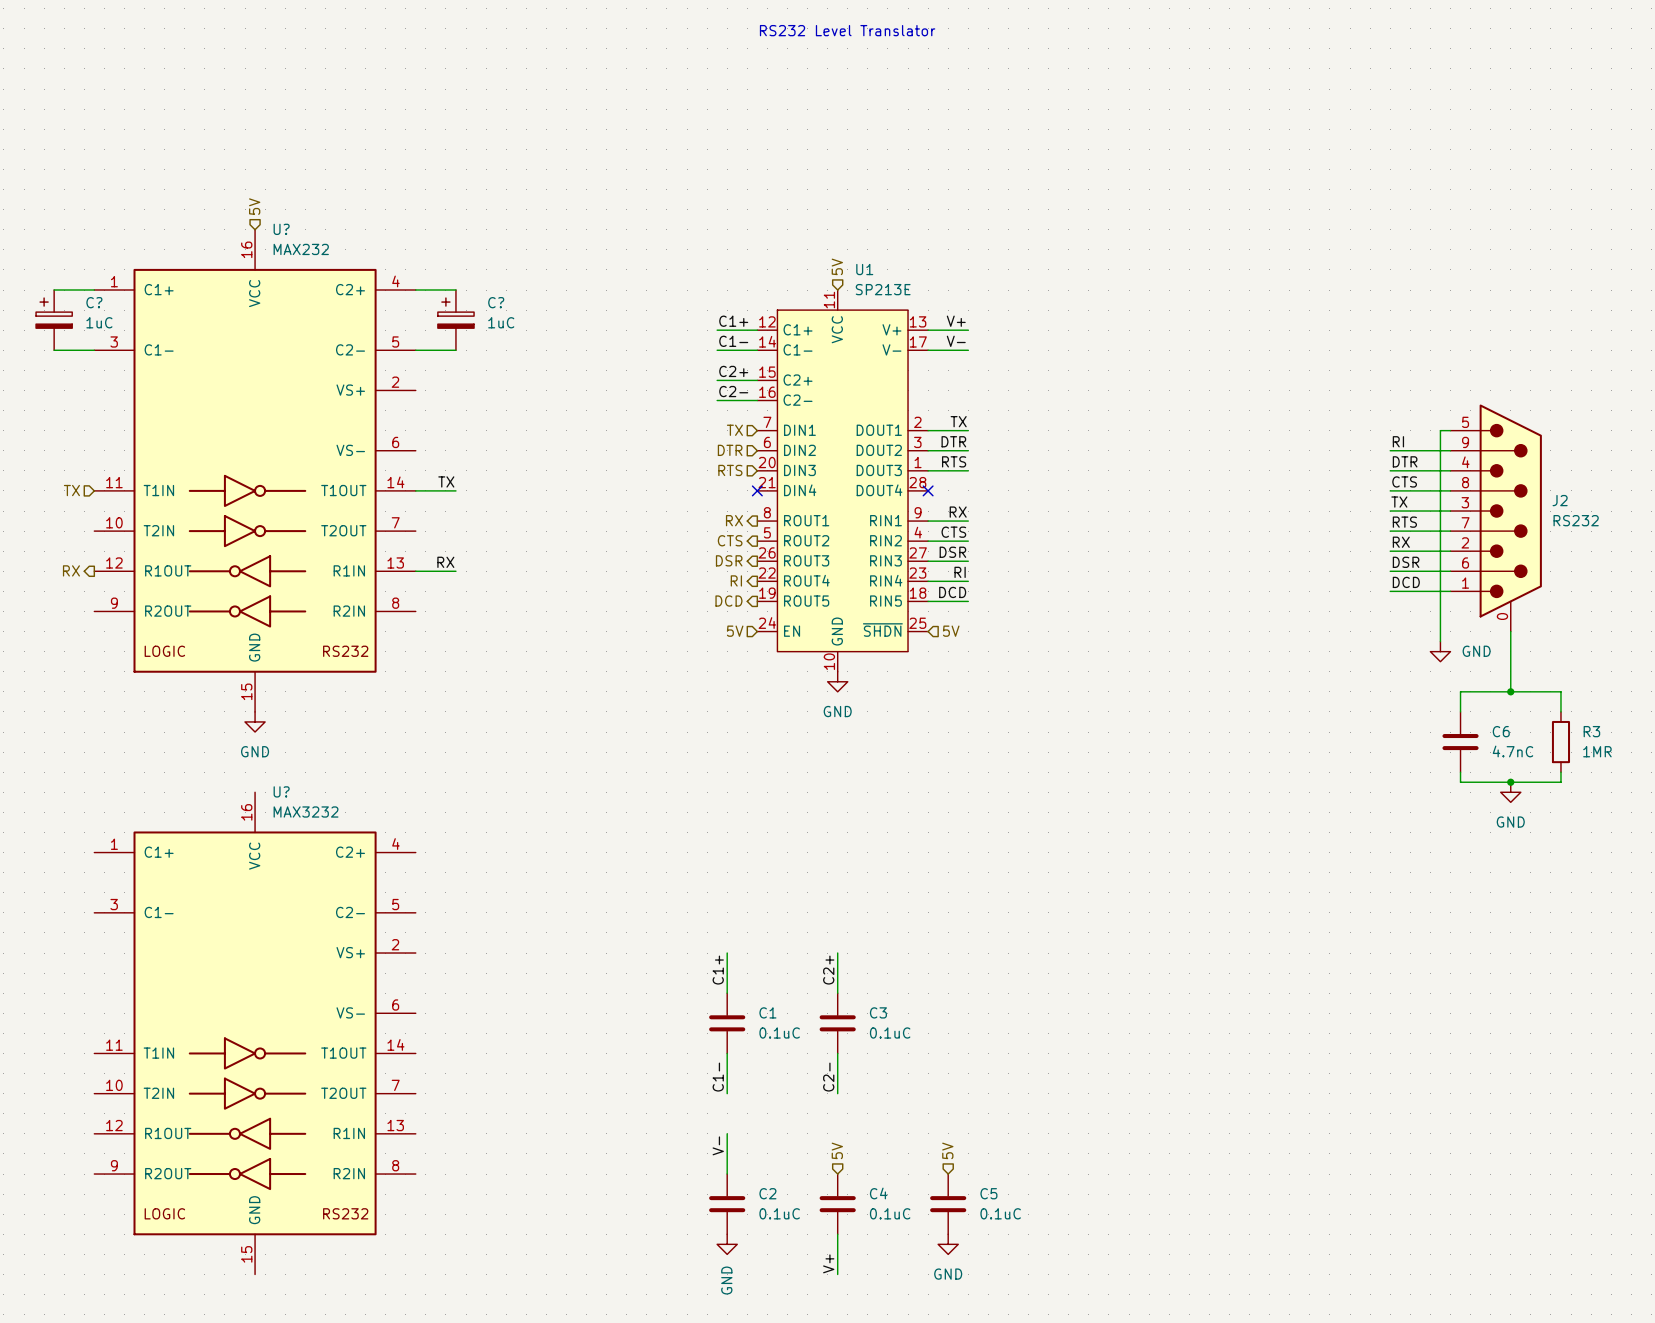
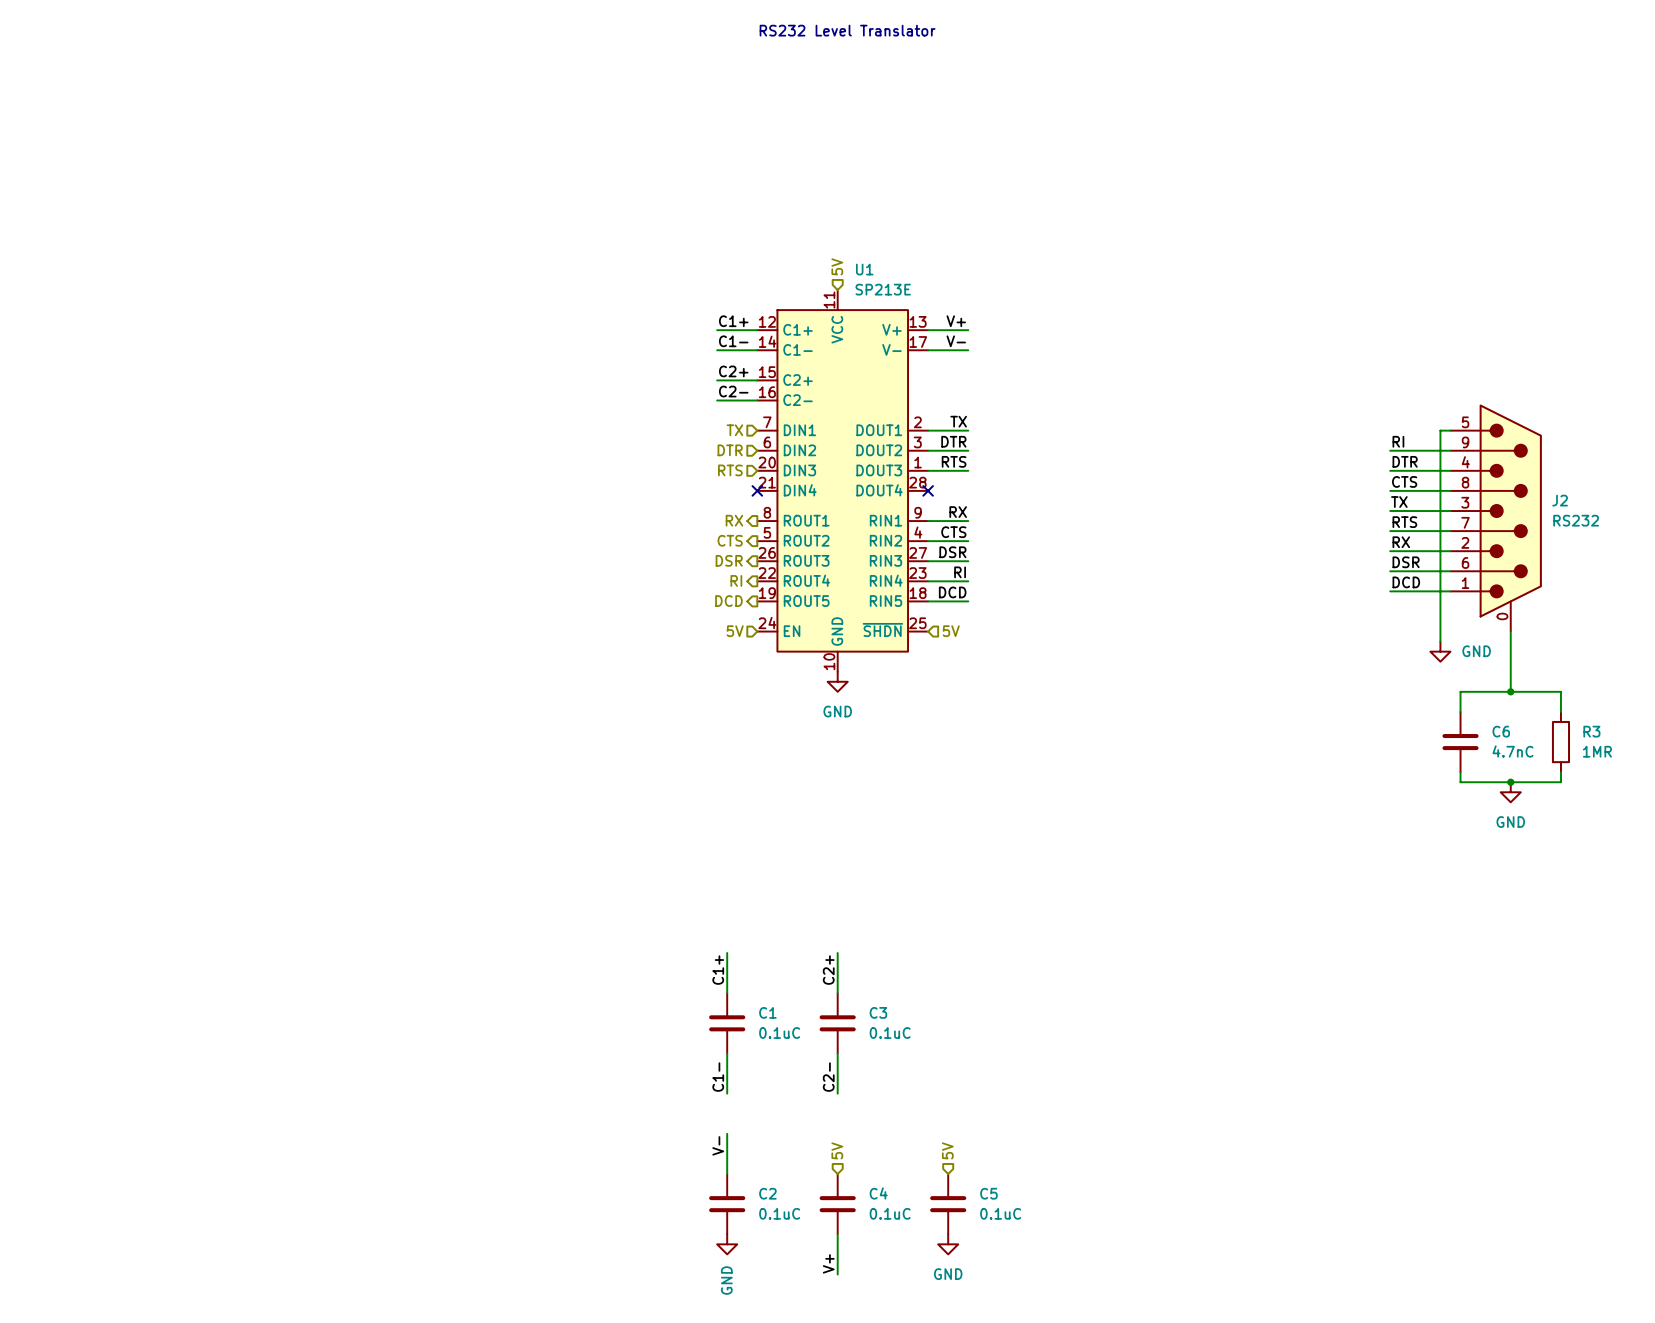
hierarchical label: 5V (254, 206) -> none
wire: (54, 290) (94, 290) -> none
wire: (415, 290) (455, 290) -> none
C?: 1uC (54, 320) -> none
C?: 1uC (455, 320) -> none
wire: (54, 350) (94, 350) -> none
wire: (415, 350) (455, 350) -> none
U?: MAX232 (255, 470) -> none
label: TX (446, 481) -> none
hierarchical label: TX (71, 490) -> none
wire: (415, 490) (455, 490) -> none
label: RX (445, 562) -> none
hierarchical label: RX (71, 570) -> none
wire: (415, 571) (455, 571) -> none
power symbol: GND (255, 721) -> none
U?: MAX3232 (255, 1033) -> none

